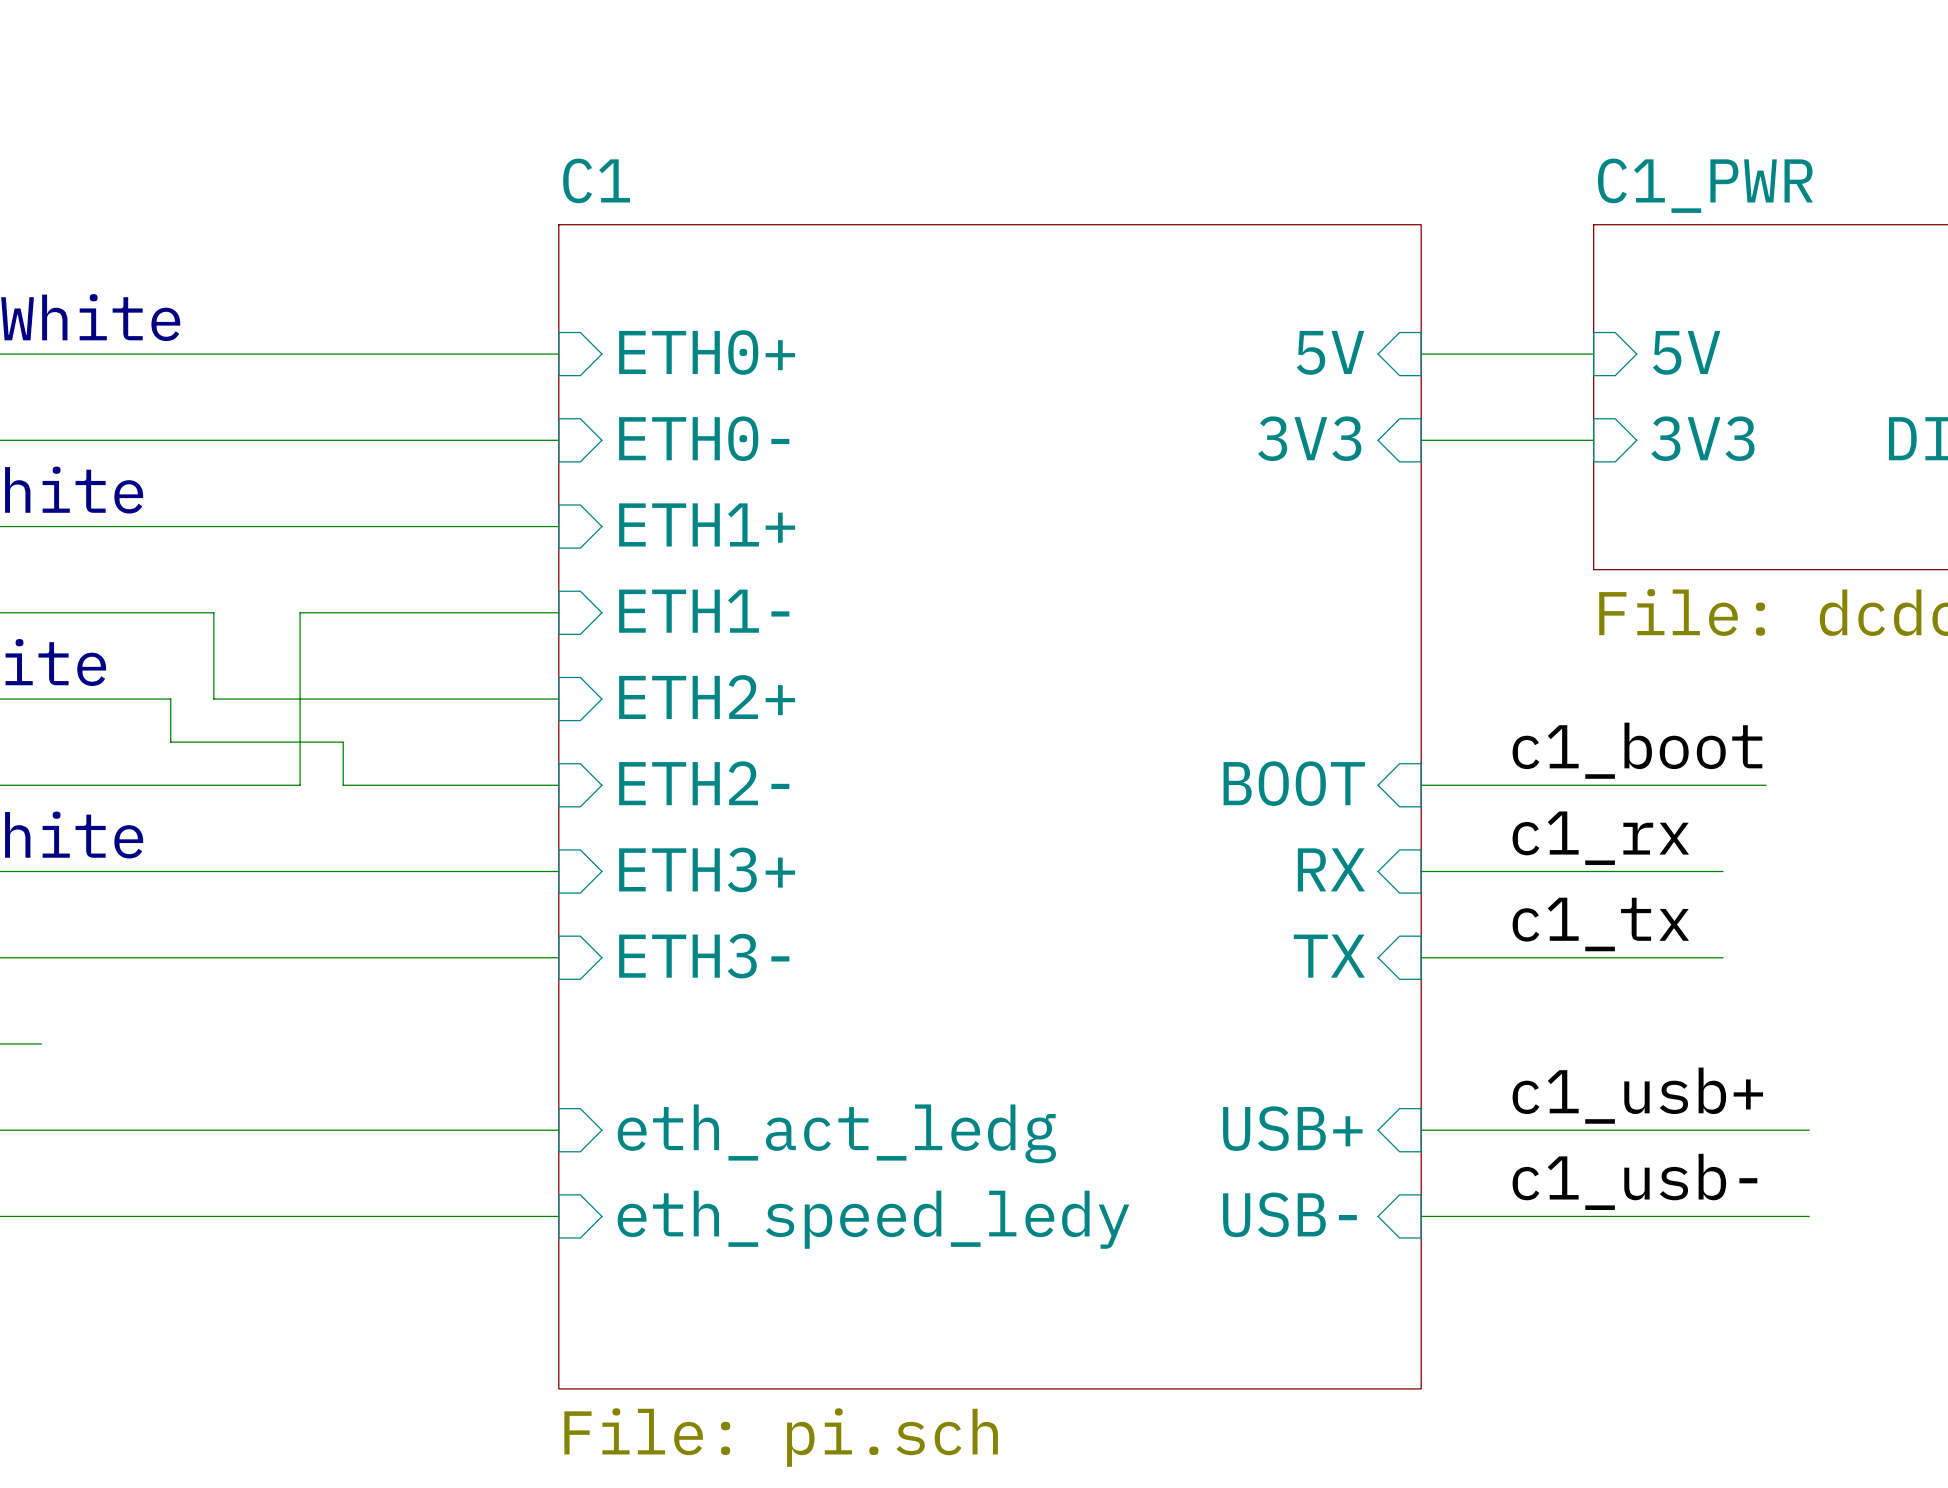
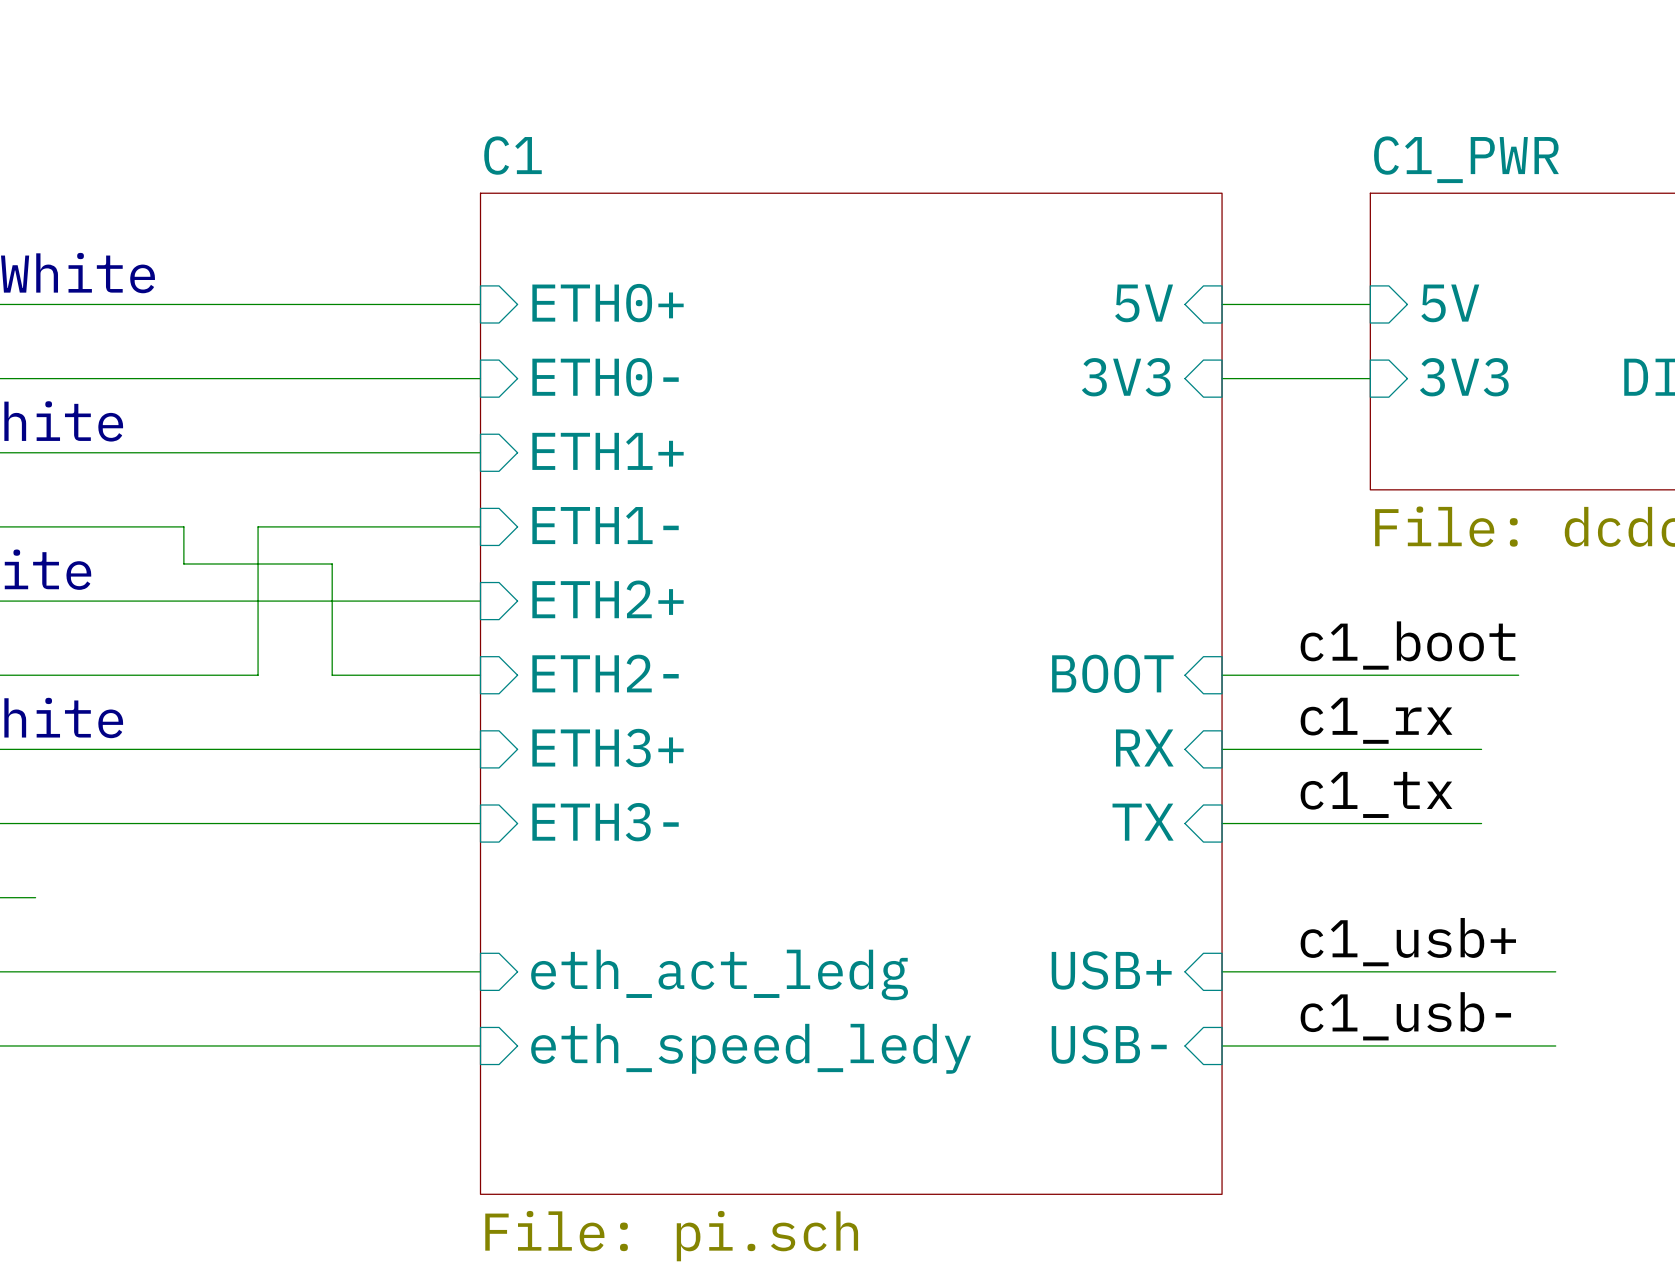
wire: (213, 655) (213, 699) -> (146, 601) (183, 601)
wire: (170, 699) (170, 742) (343, 742) (343, 785) (386, 785) -> (183, 563) (332, 563) (332, 675)

